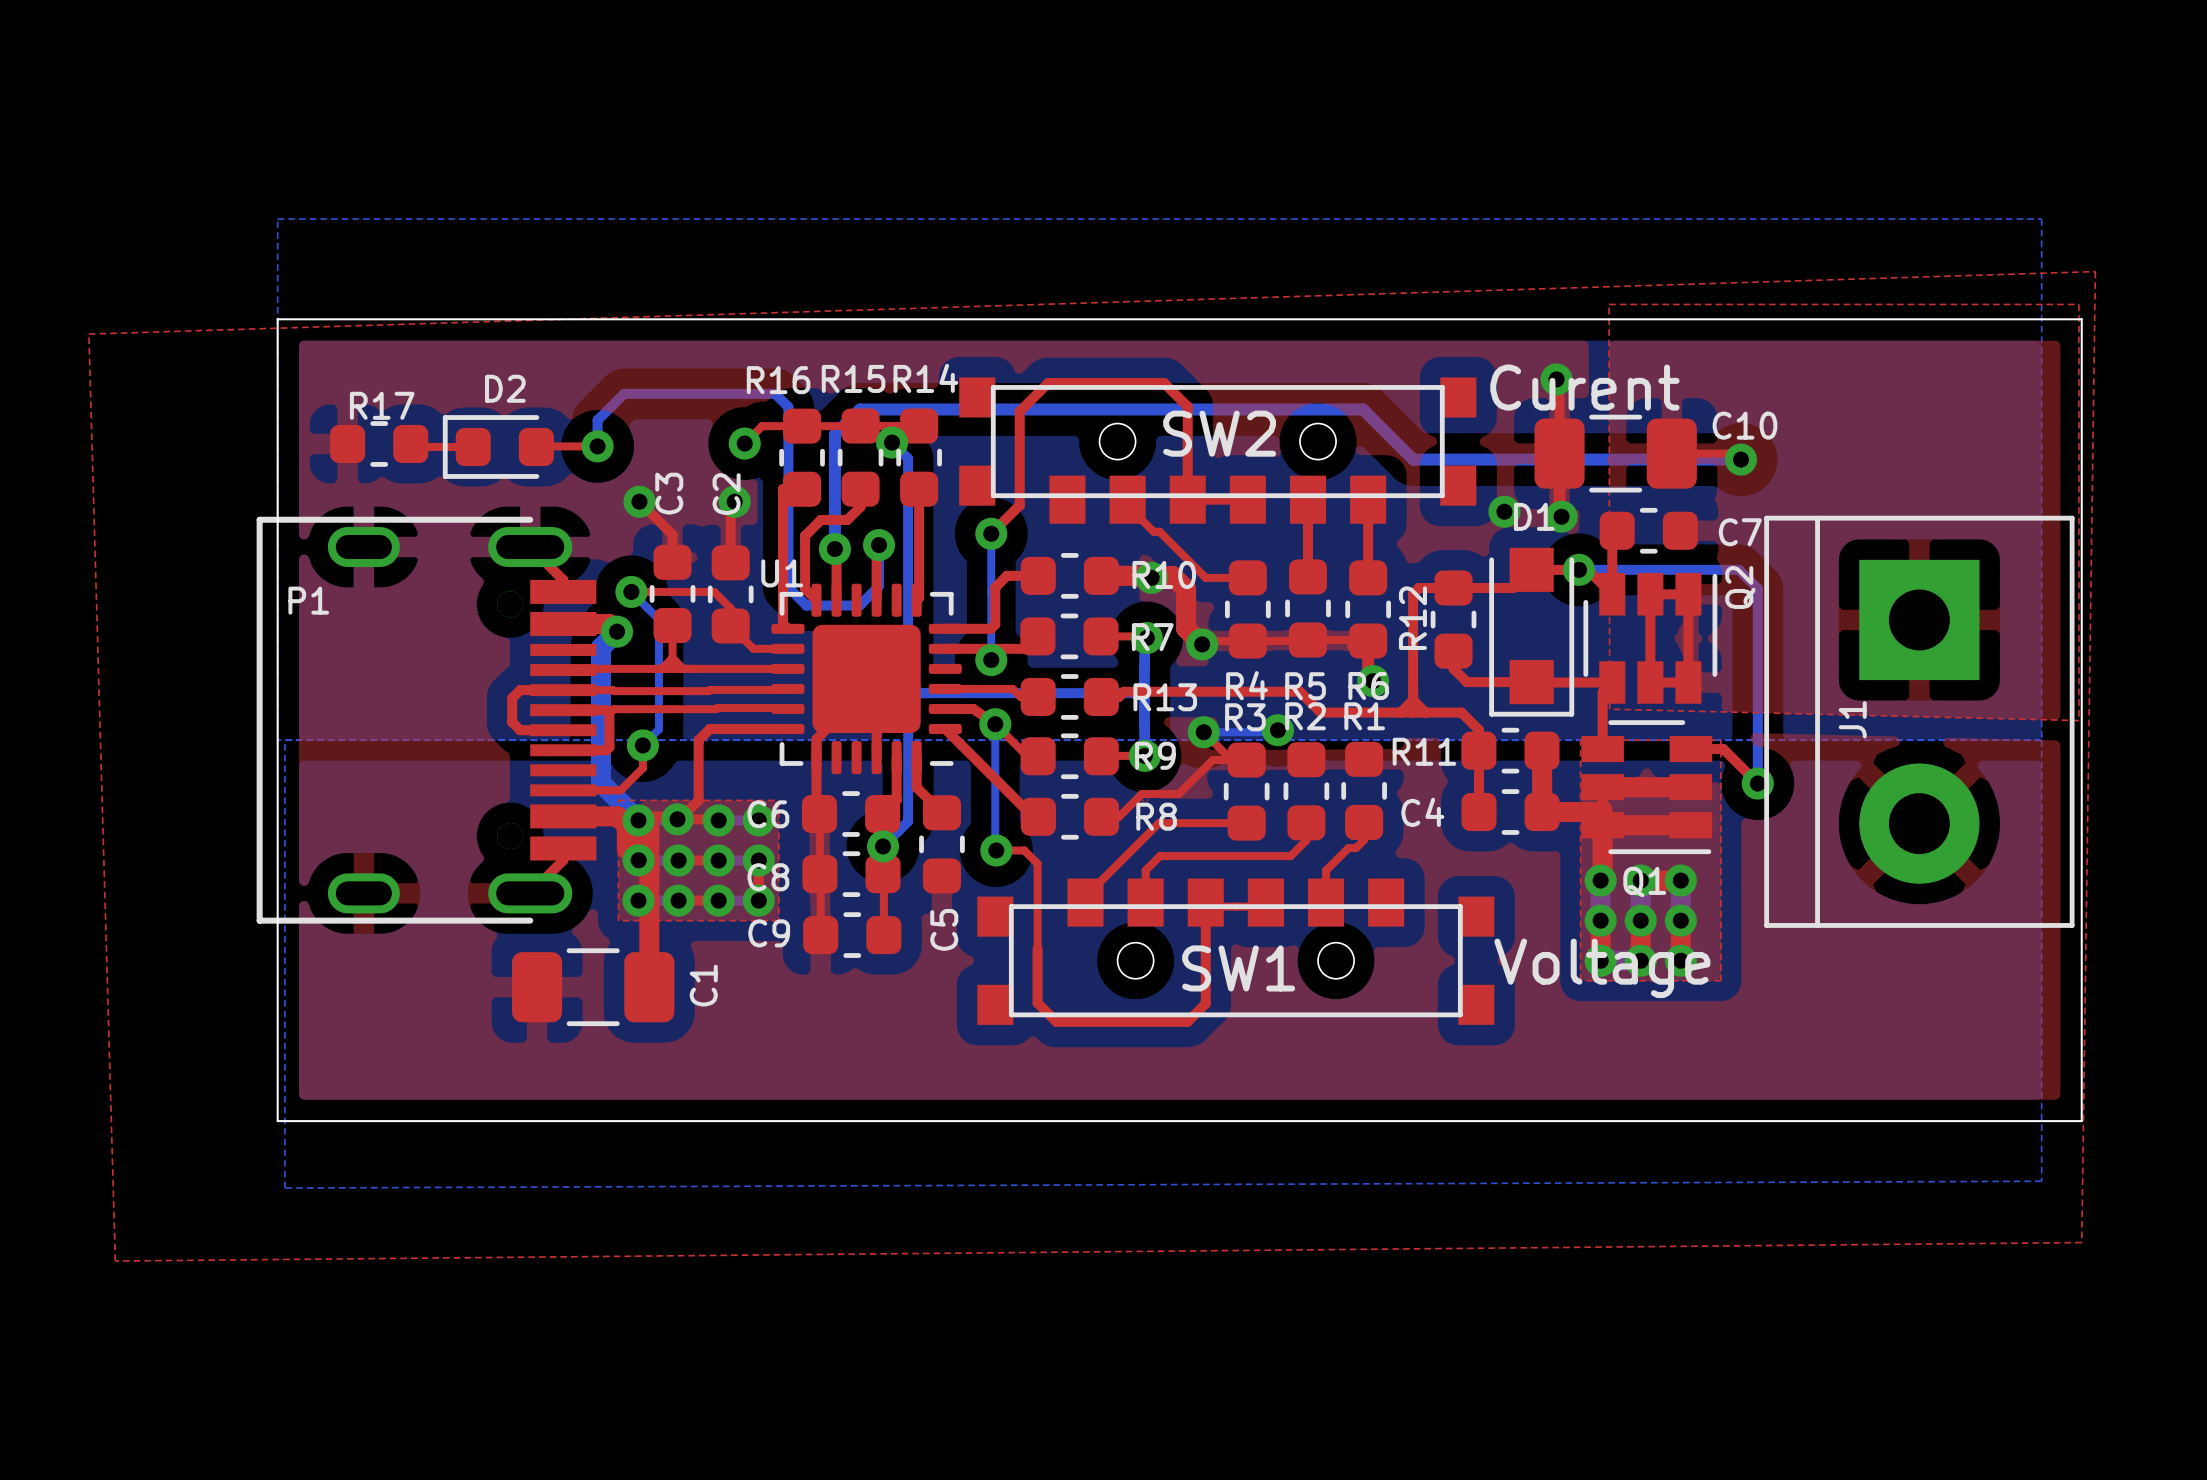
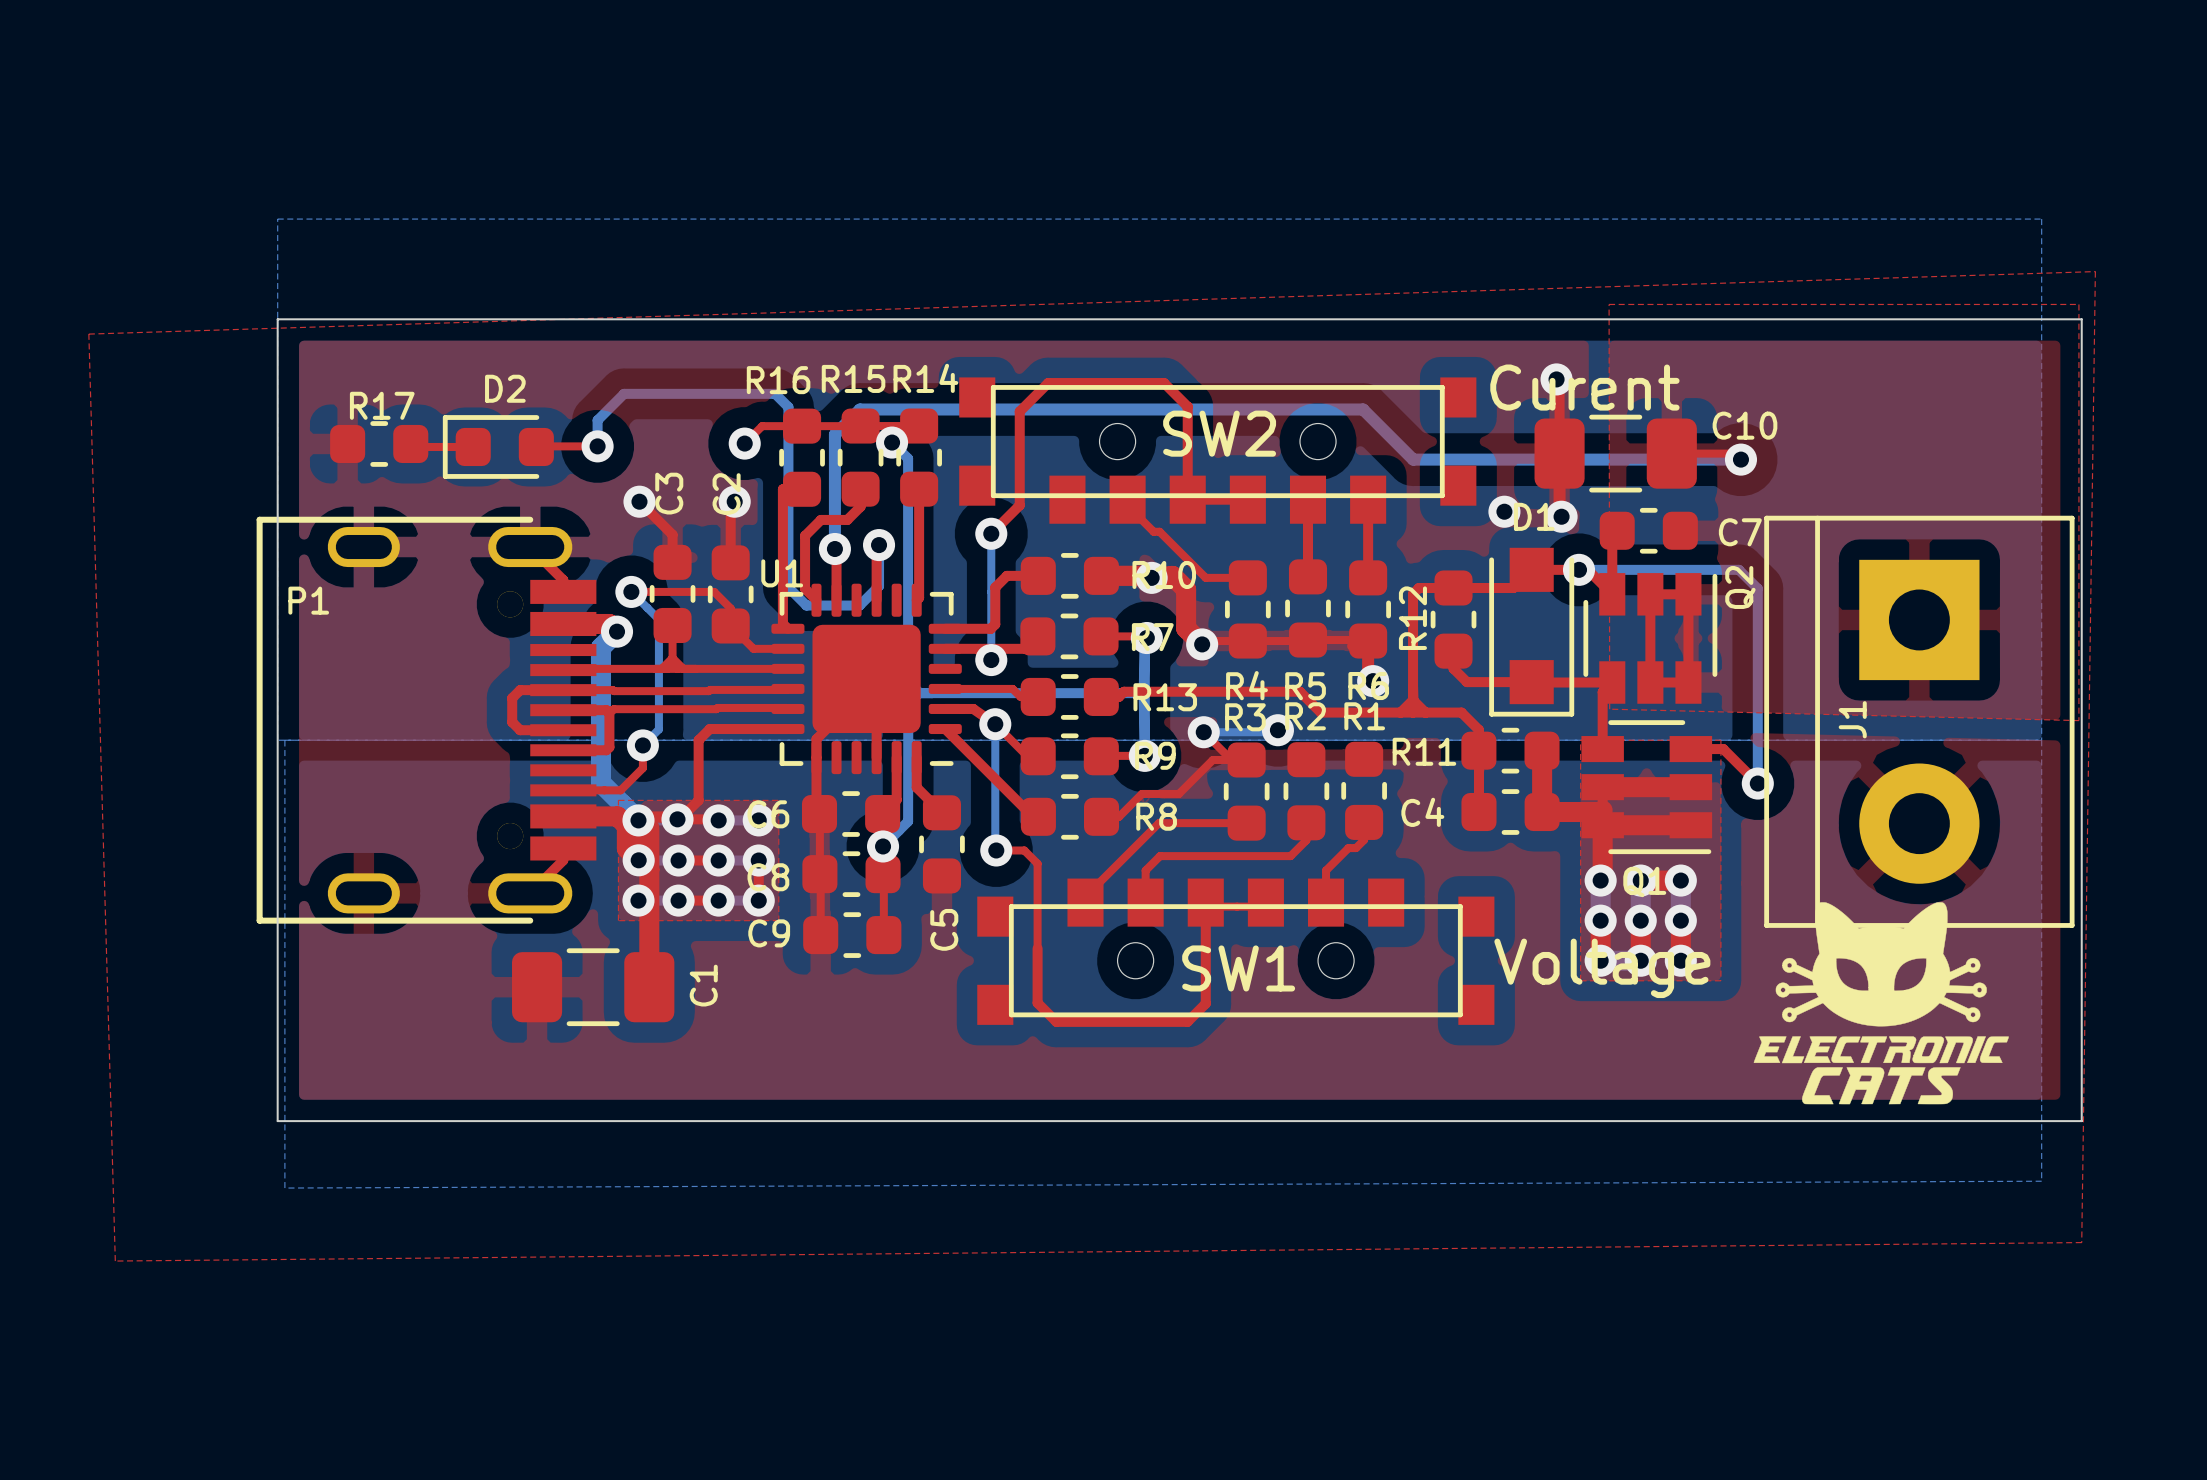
drawing: none -> [1753, 902, 2009, 1105]

